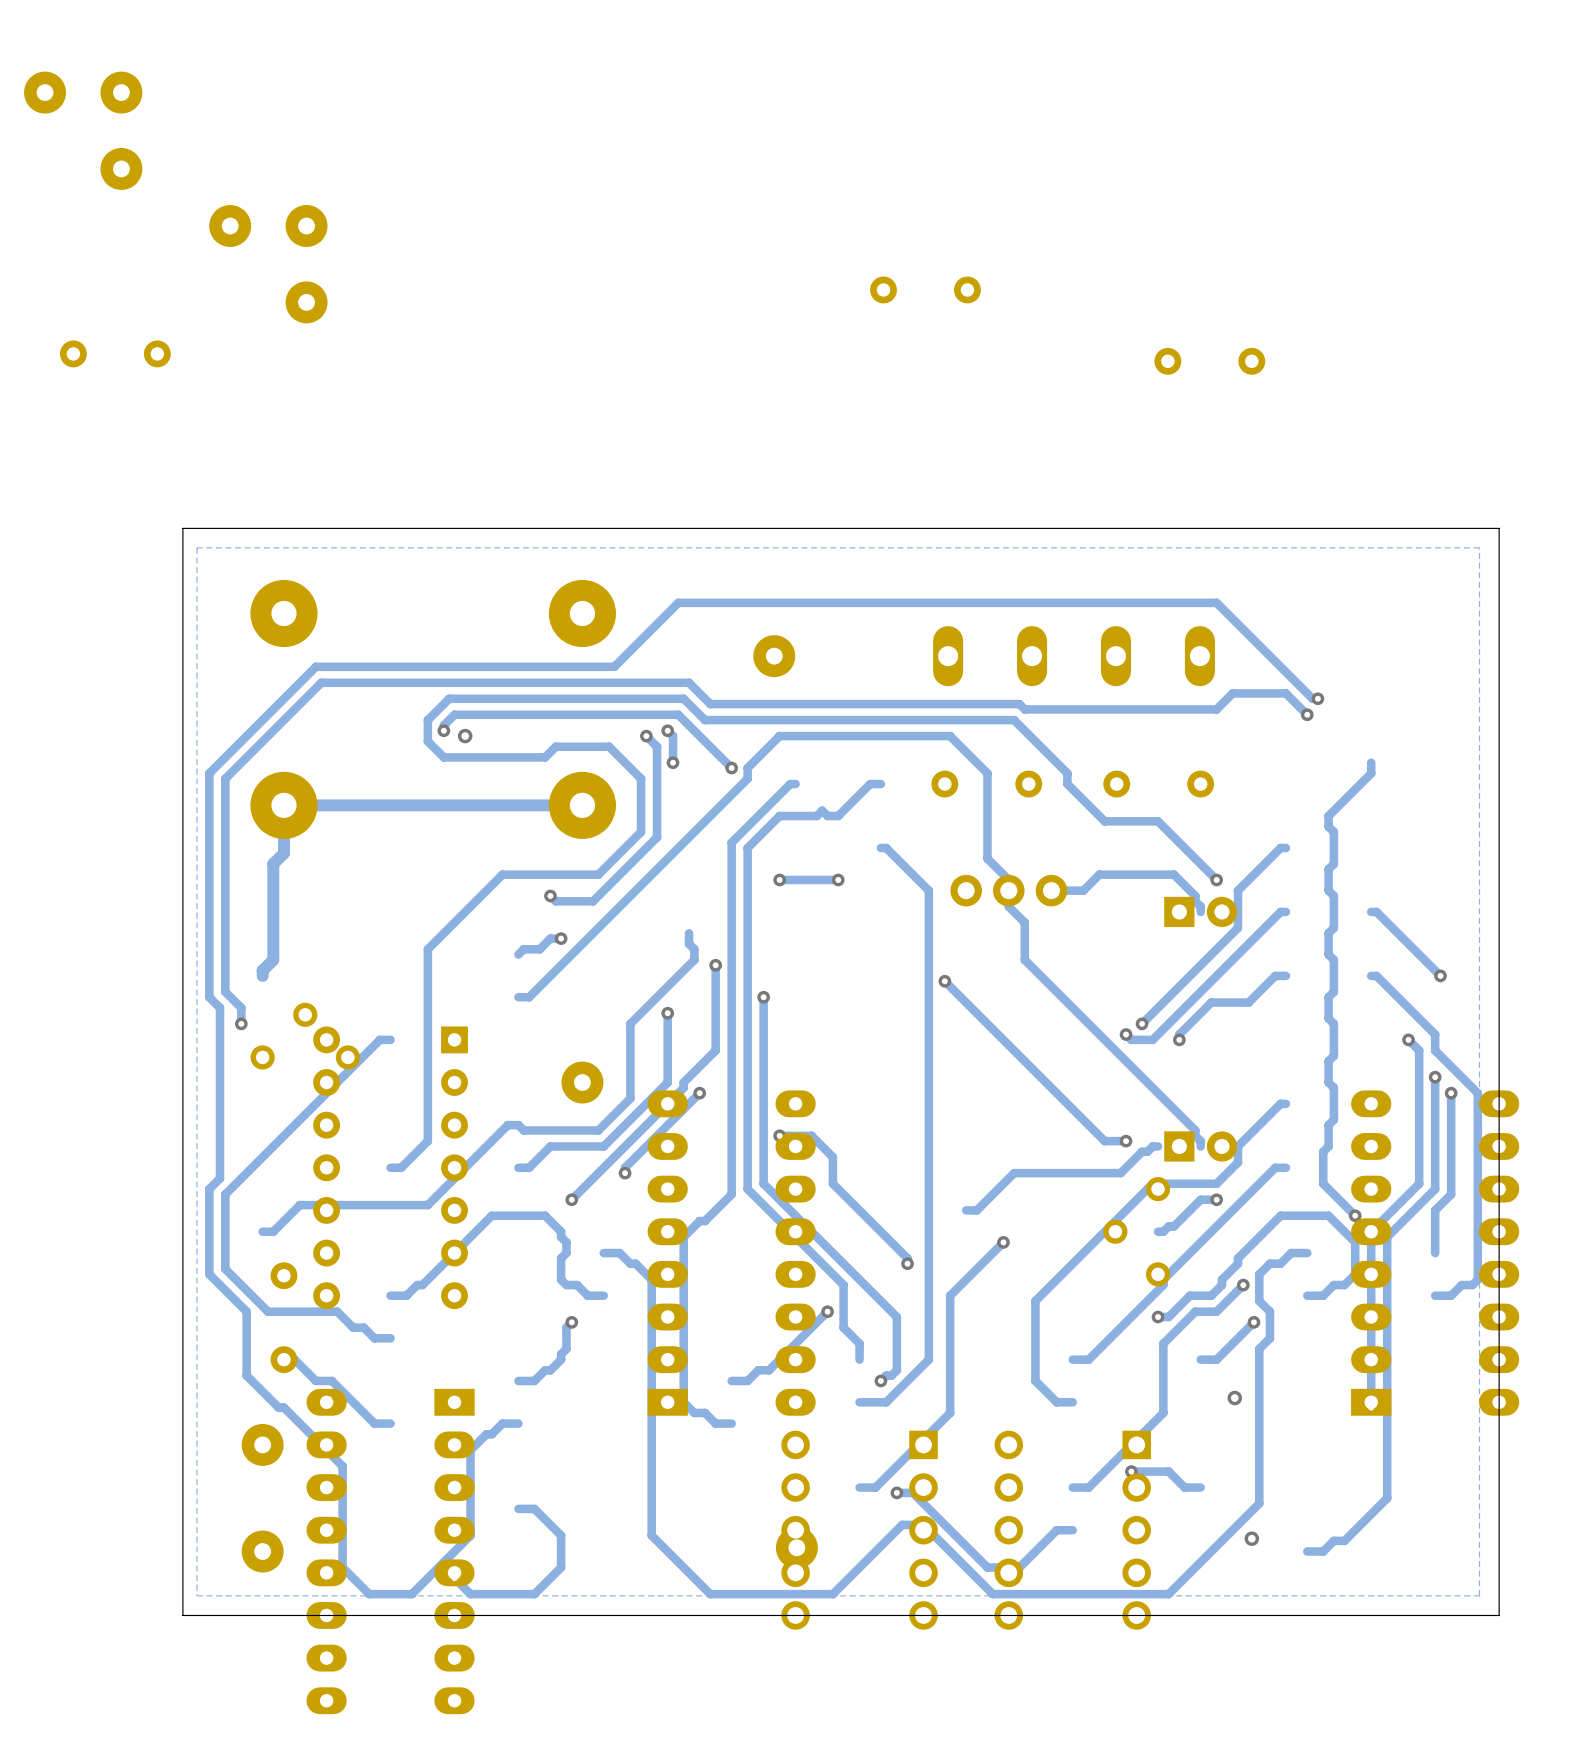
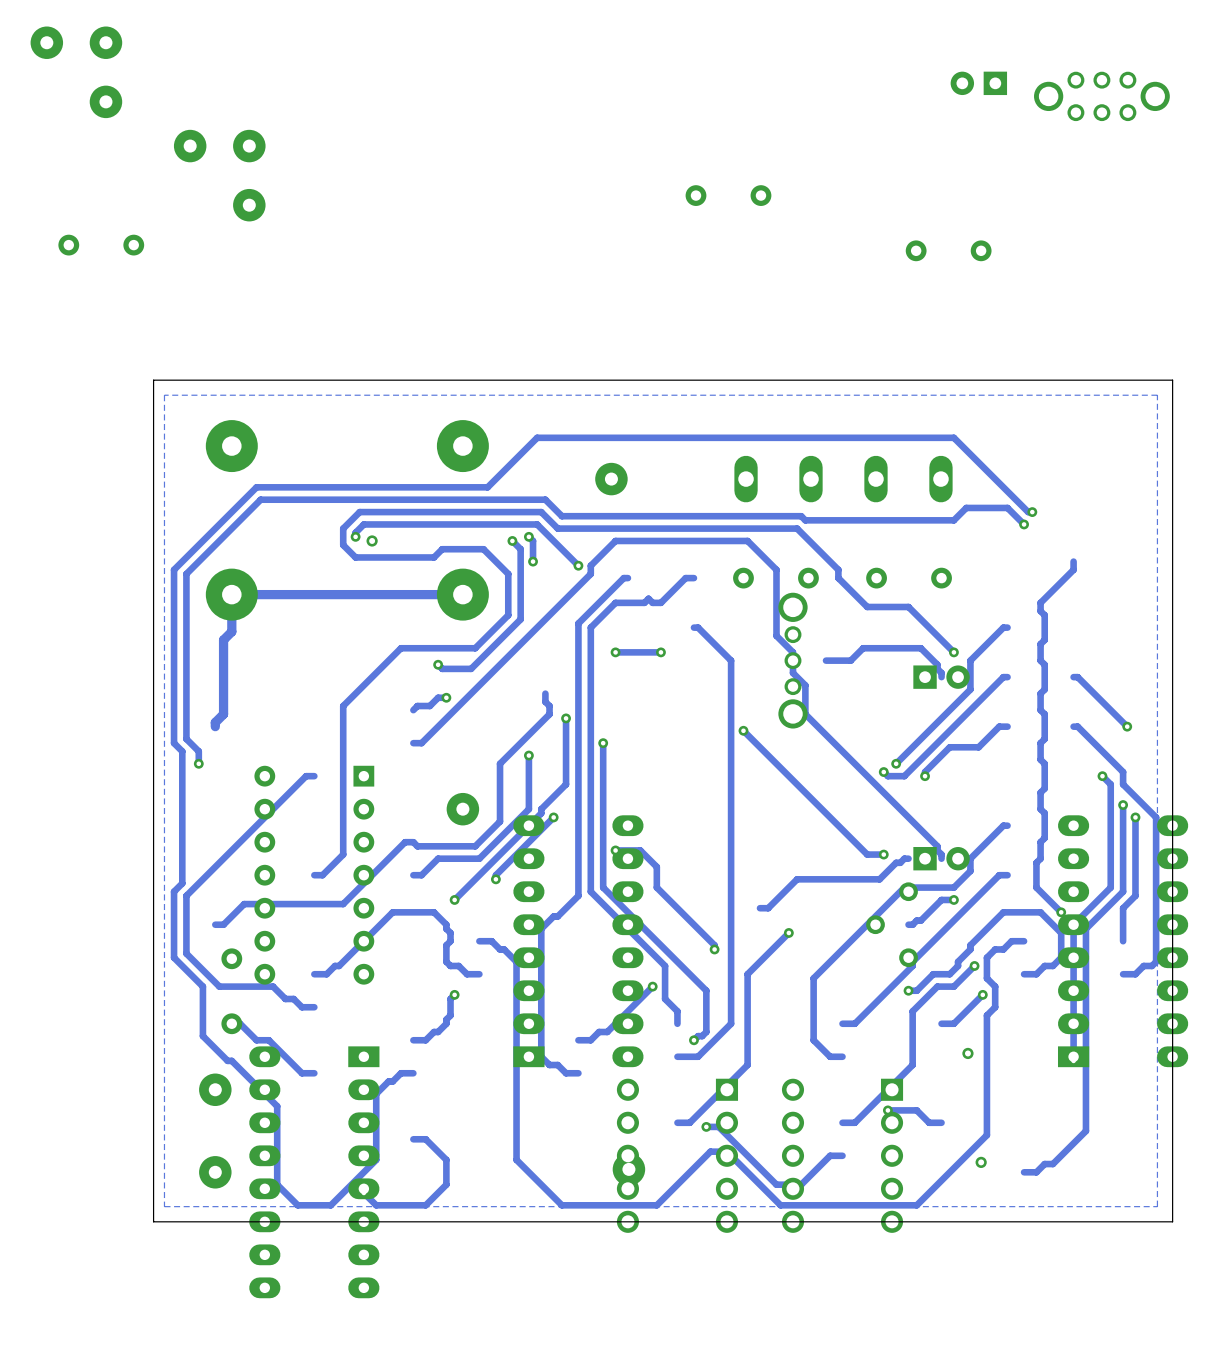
part: none -> (978, 83)
part: none -> (1101, 96)
part footprint: [950, 874, 1068, 907] -> [778, 592, 808, 729]
part: (305, 1036) -> none

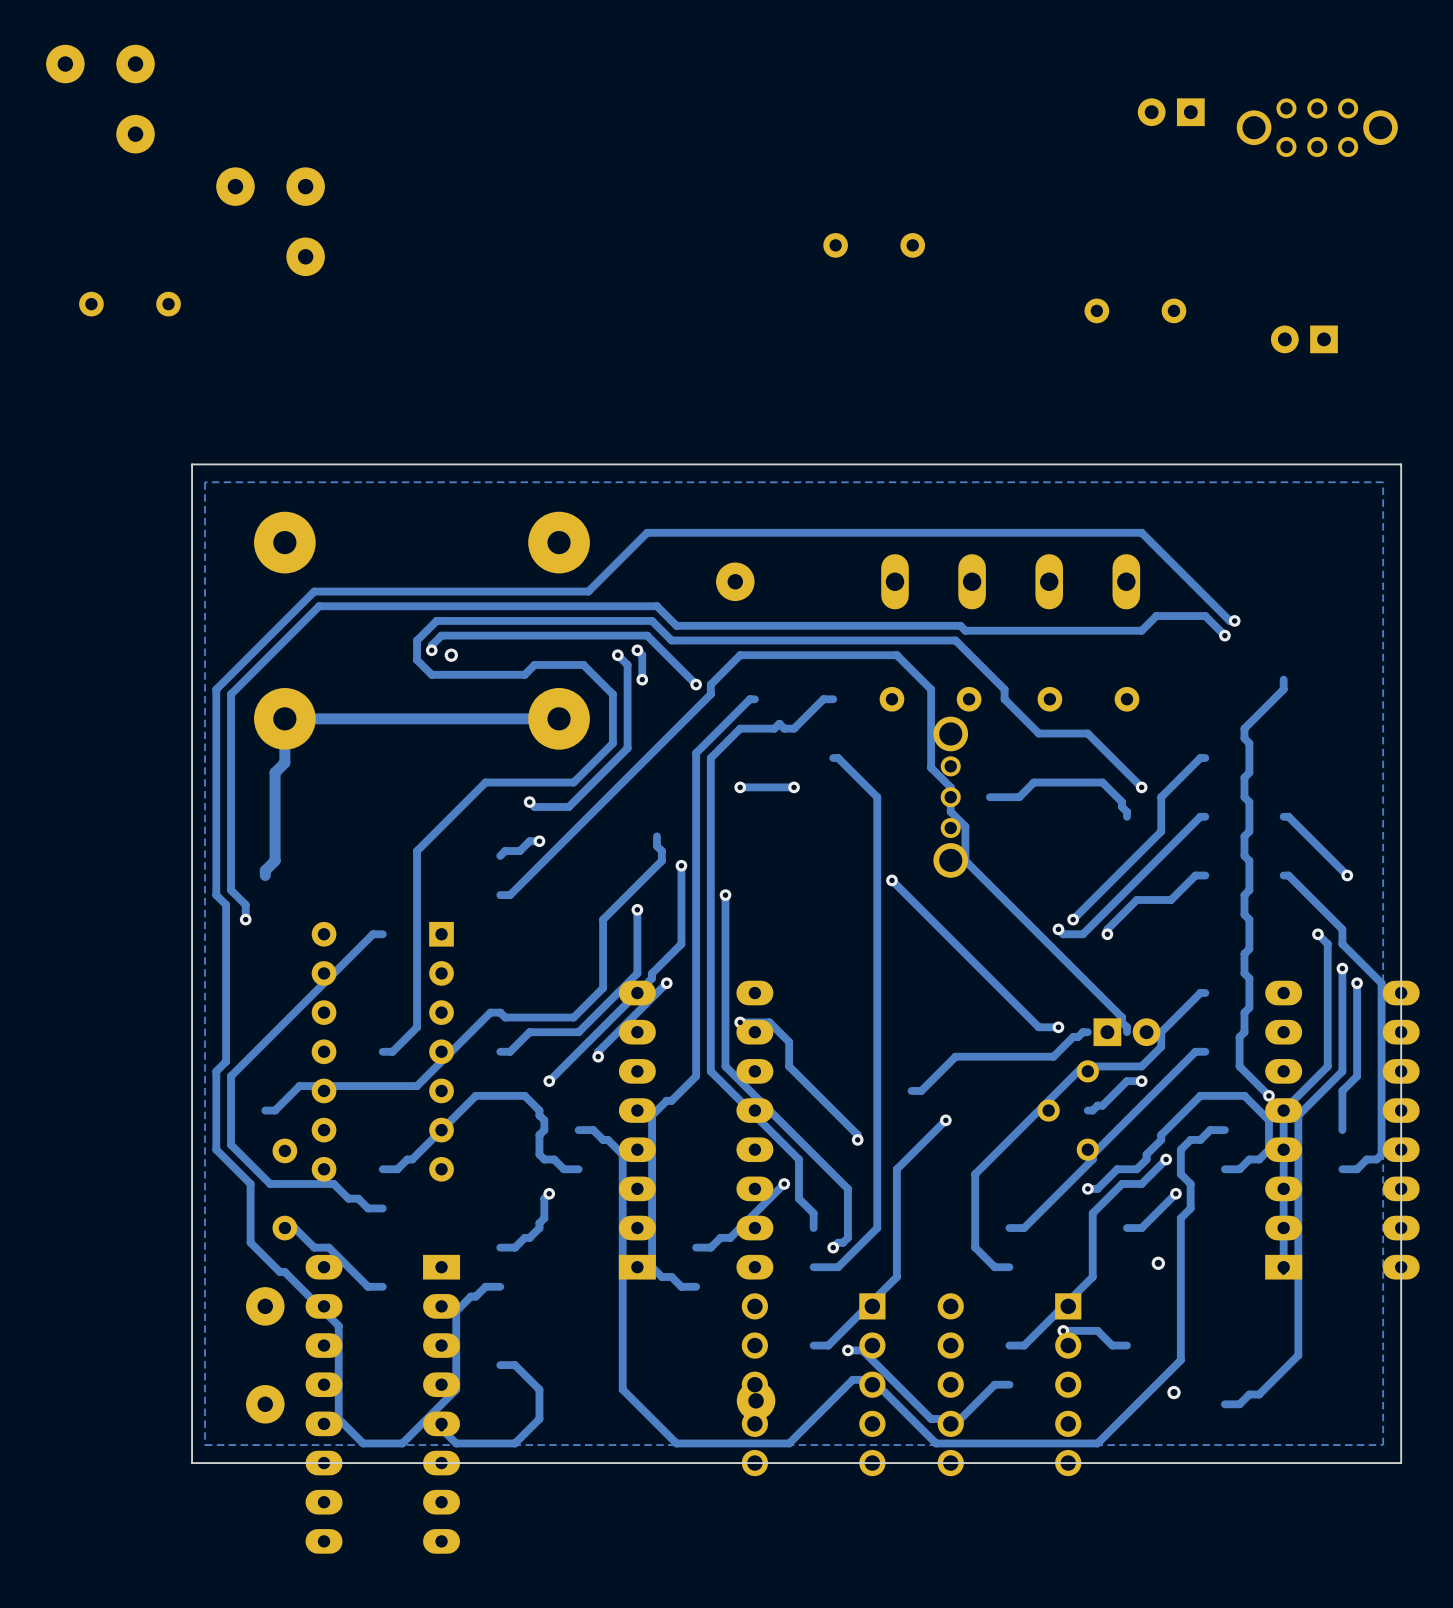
part: none -> (1304, 339)
part: (941, 677) -> none
part: (462, 809) -> none

